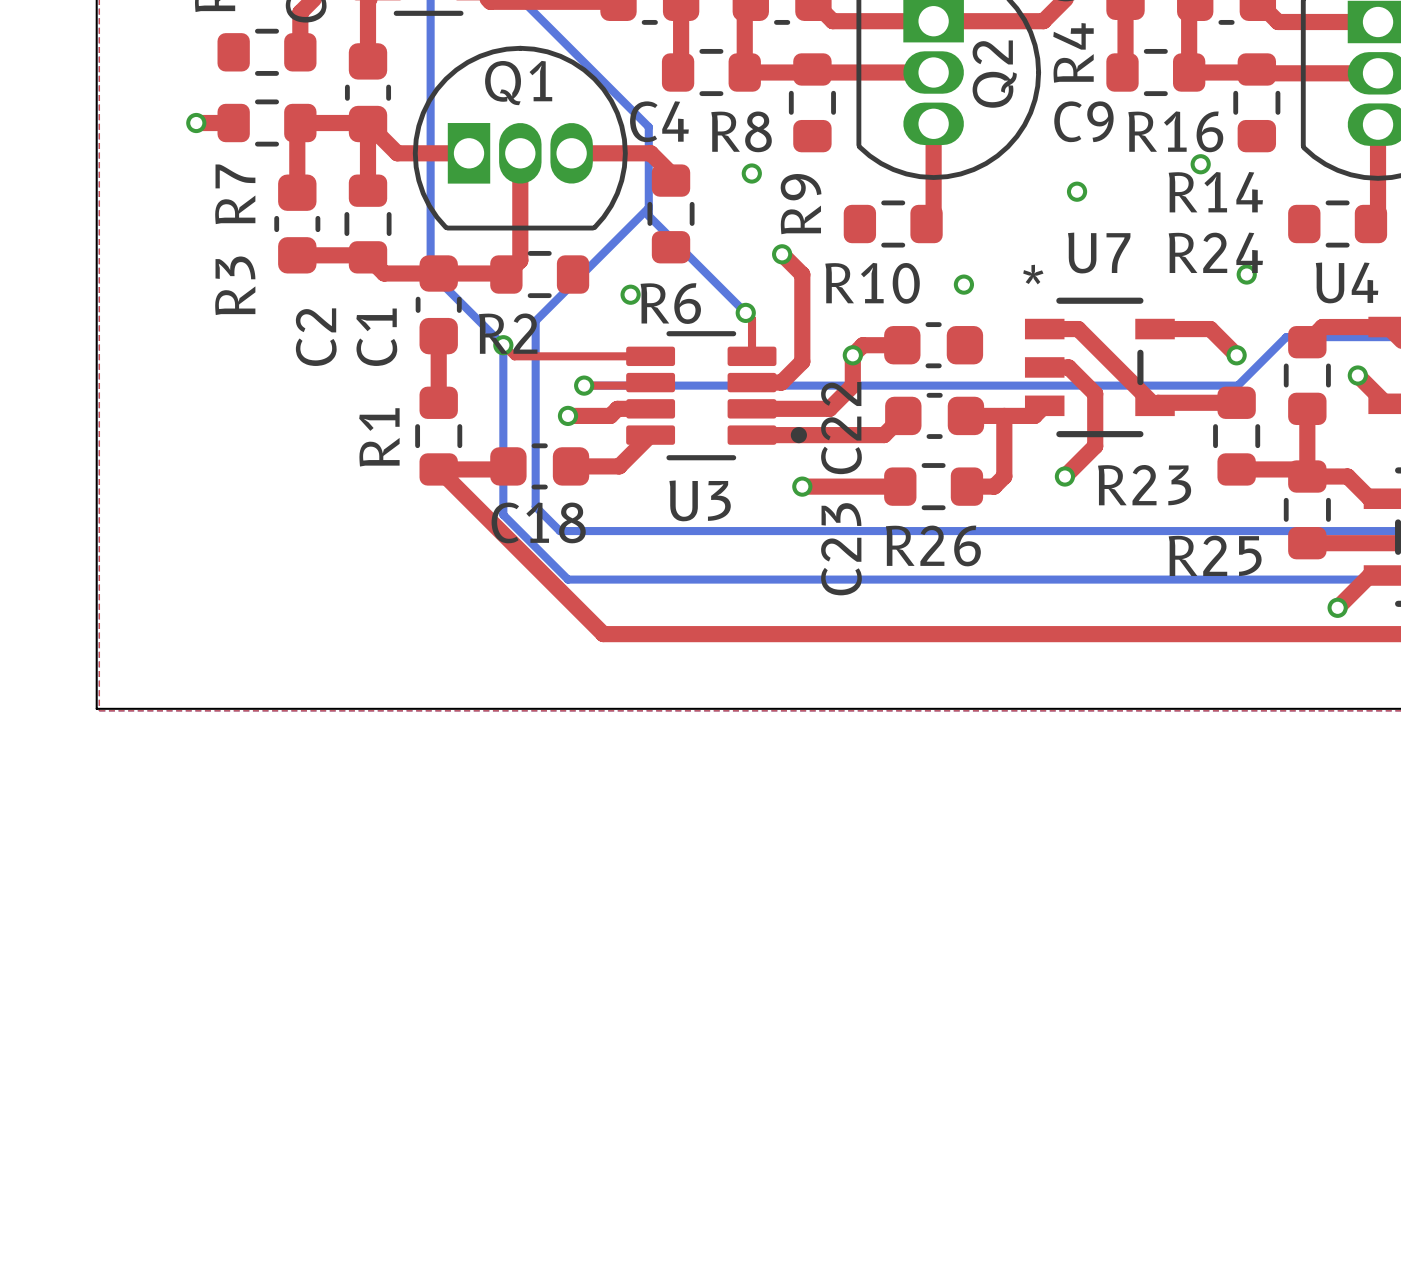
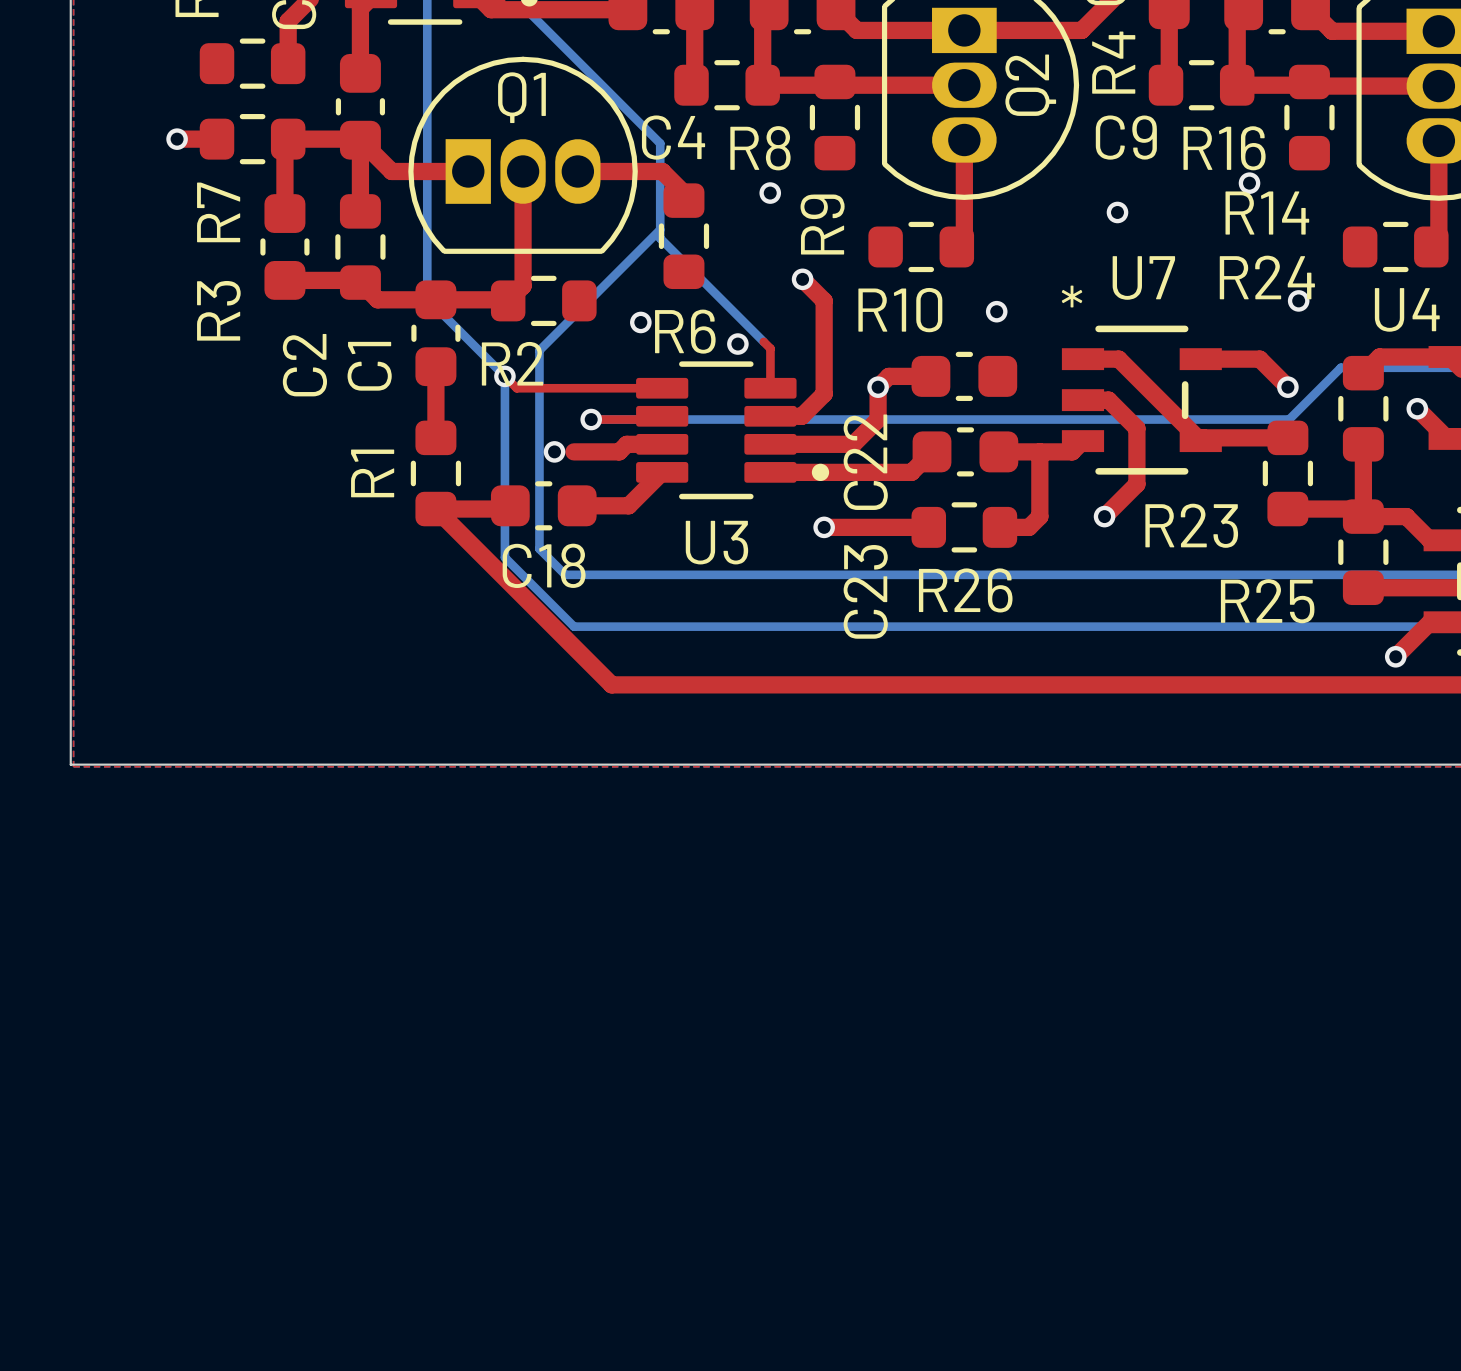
via position: (745, 312) -> (737, 344)
via position: (567, 415) -> (554, 451)

